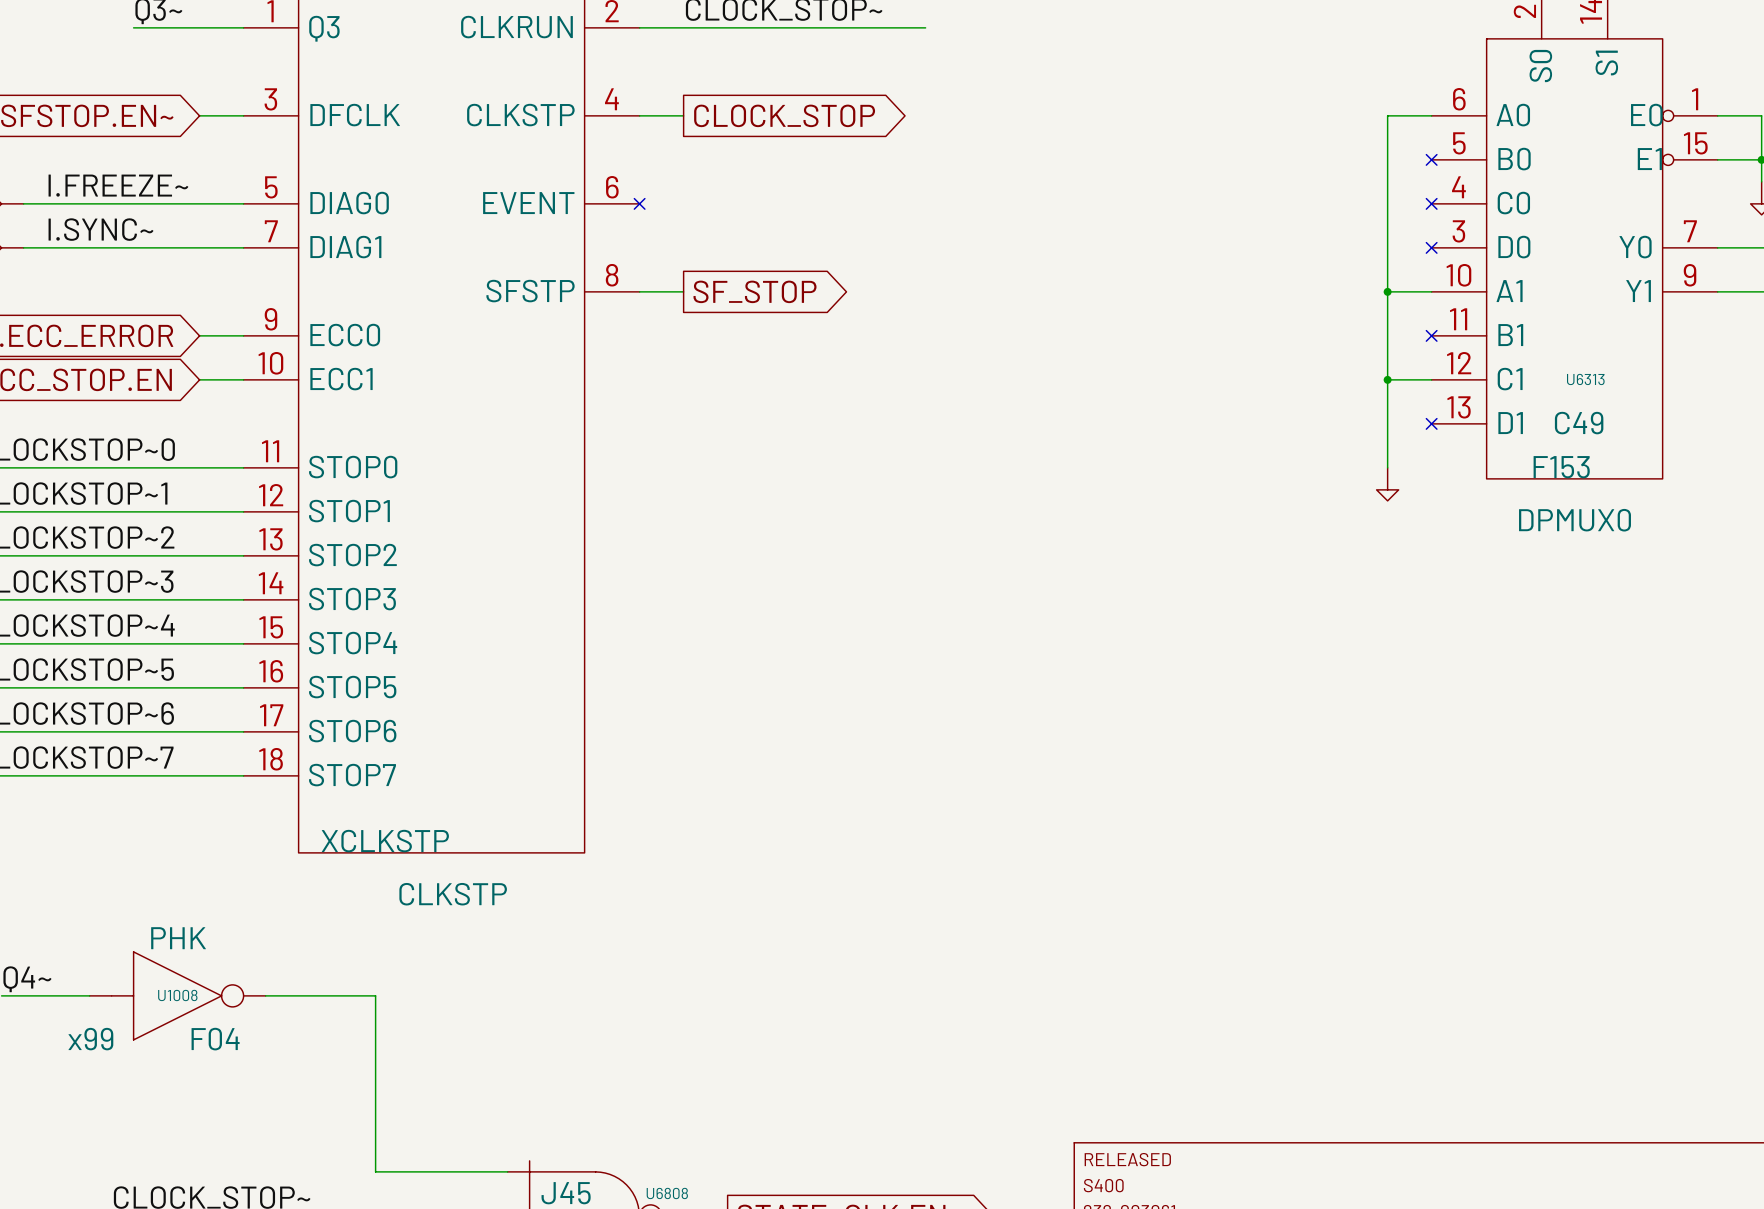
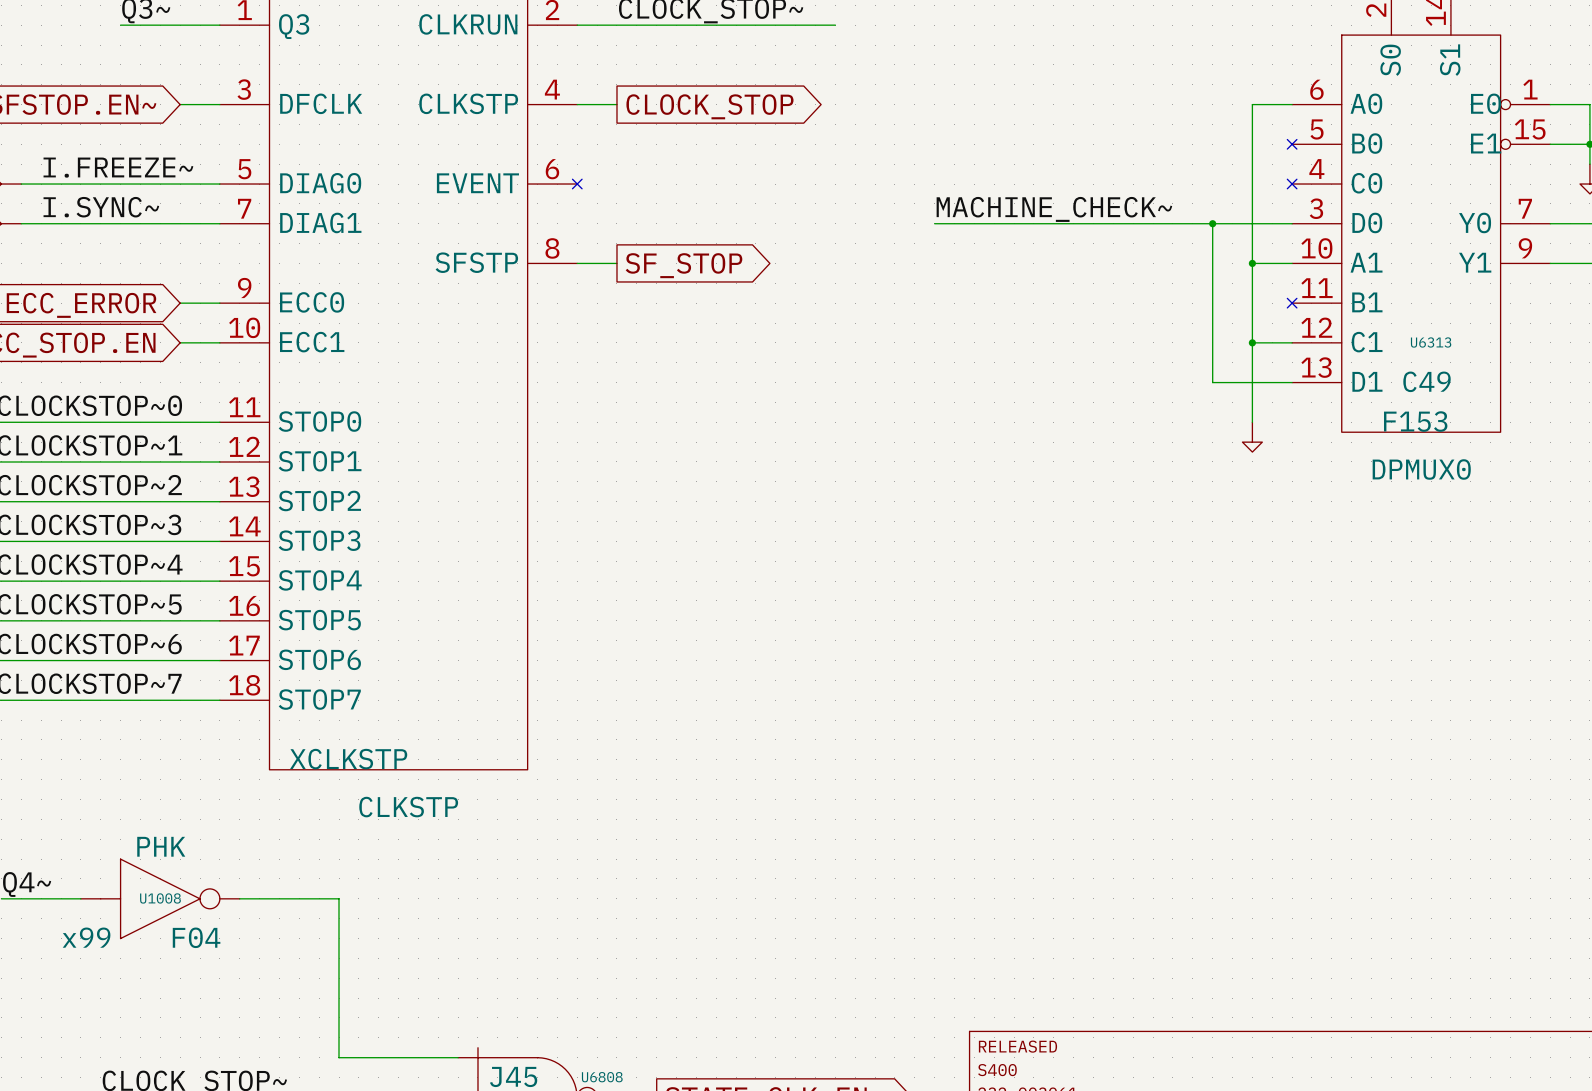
label: none -> MACHINE_CHECK~ (1054, 209)
wire: none -> (934, 223) (1292, 223)
wire: none -> (1212, 223) (1212, 382) (1292, 382)
junction: none -> (1212, 223)
no-connect mark: (1431, 247) -> none
no-connect mark: (1431, 423) -> none

